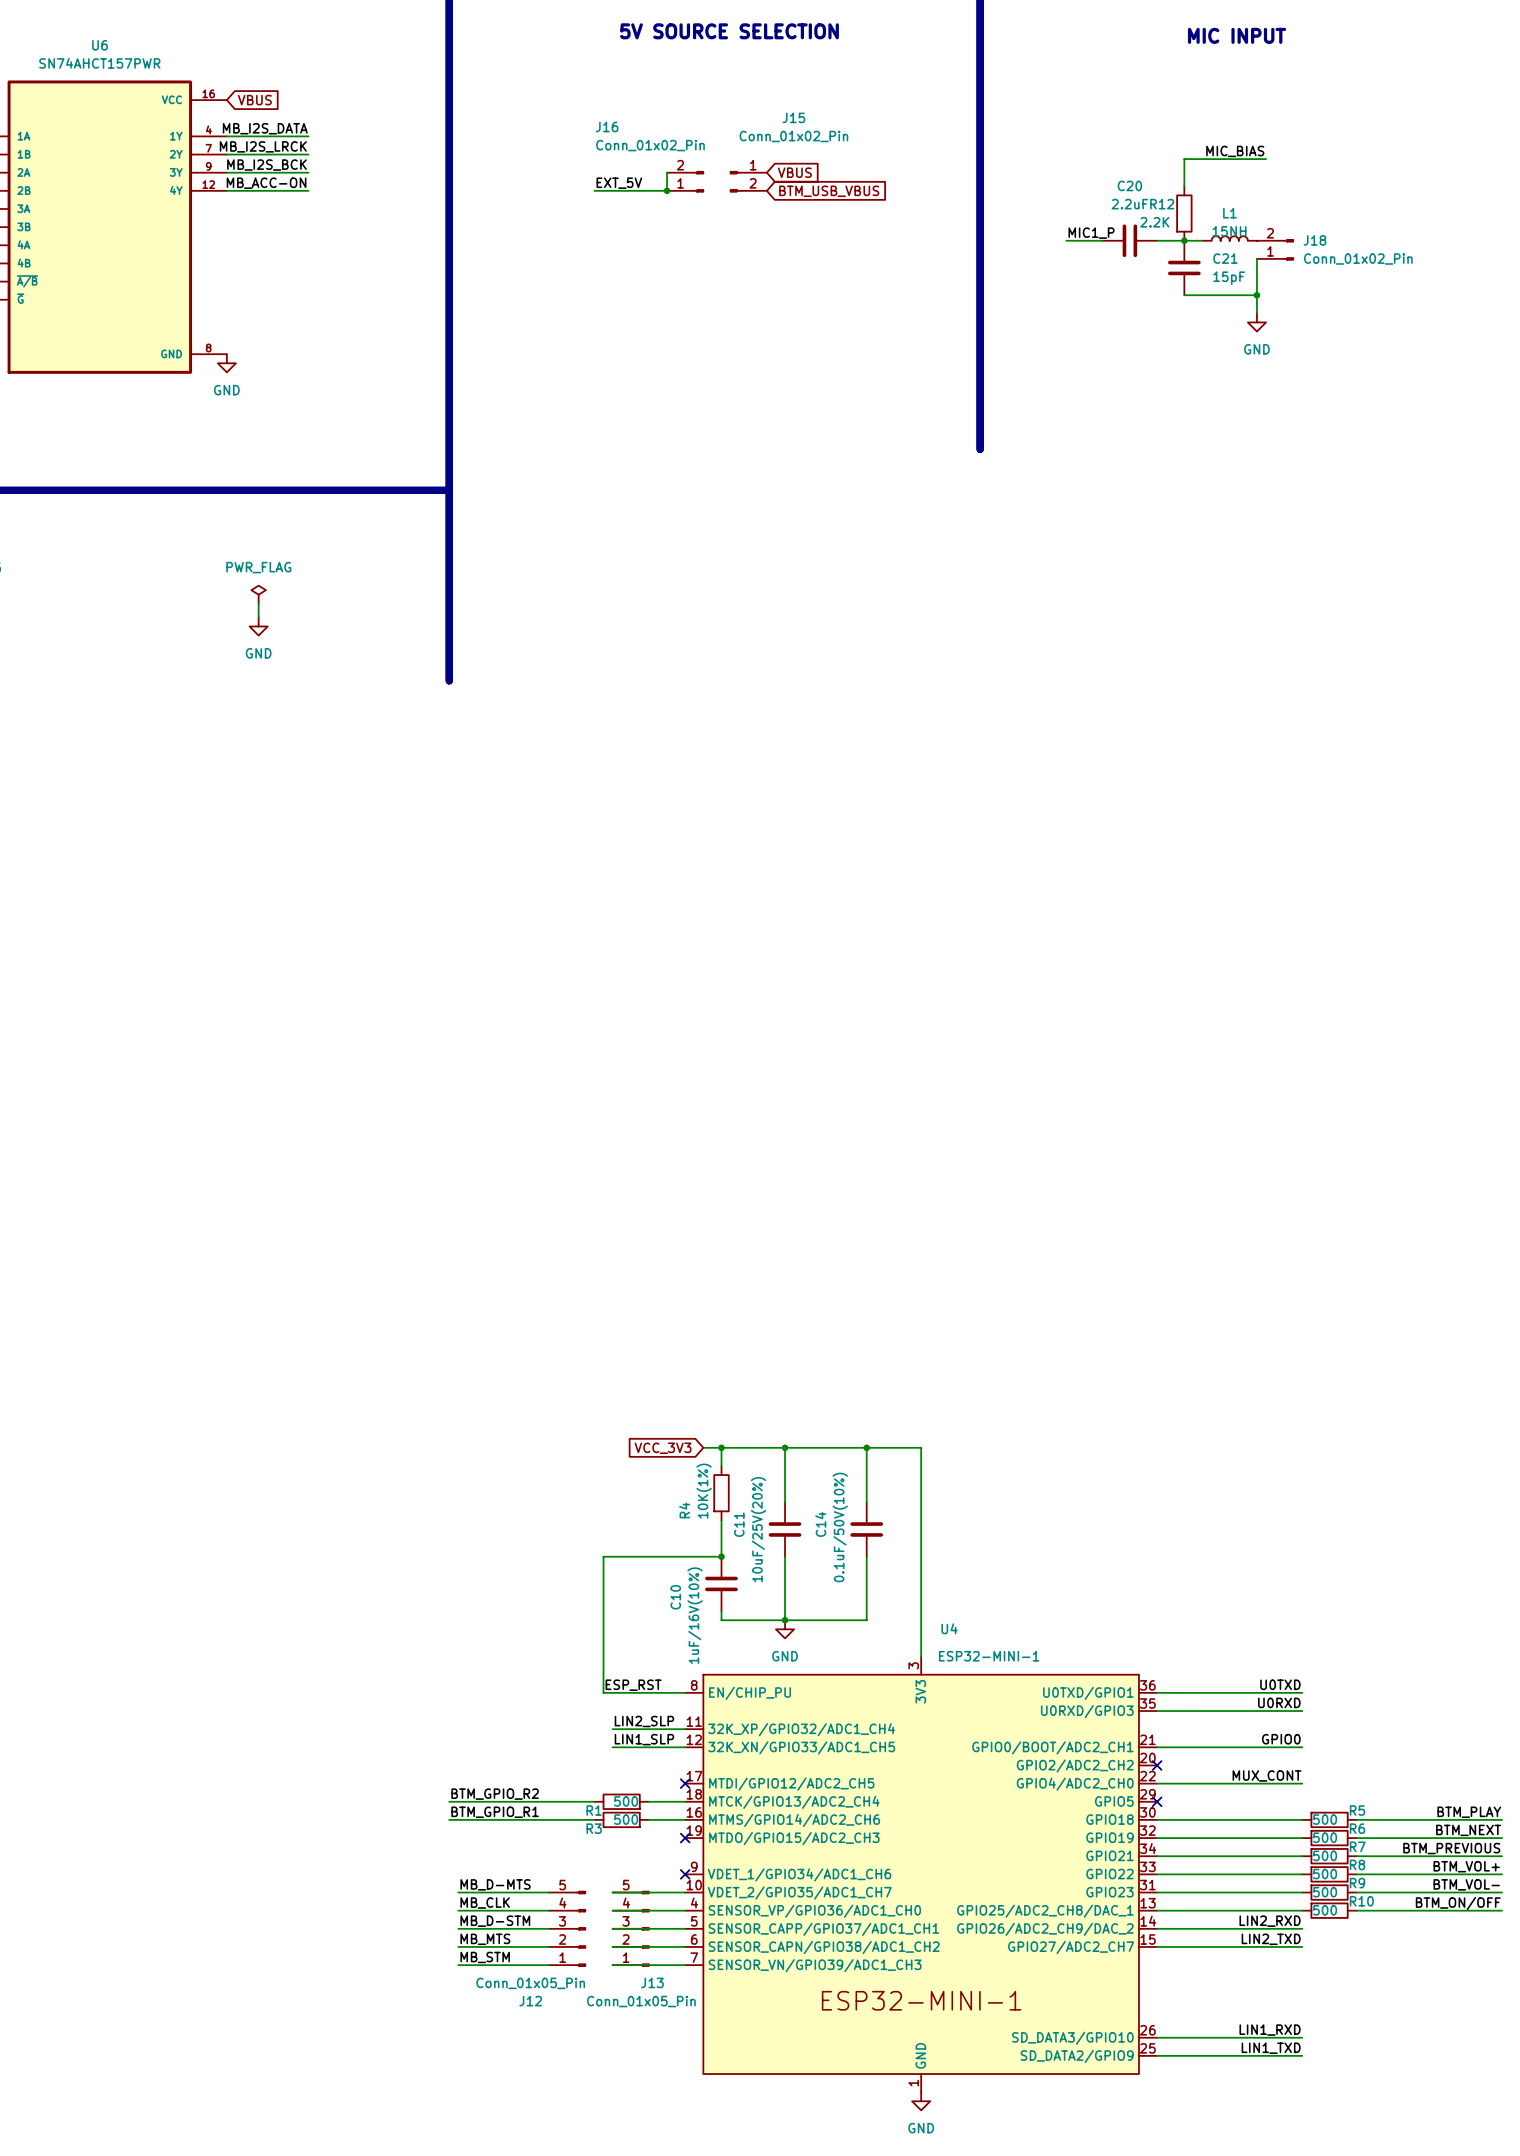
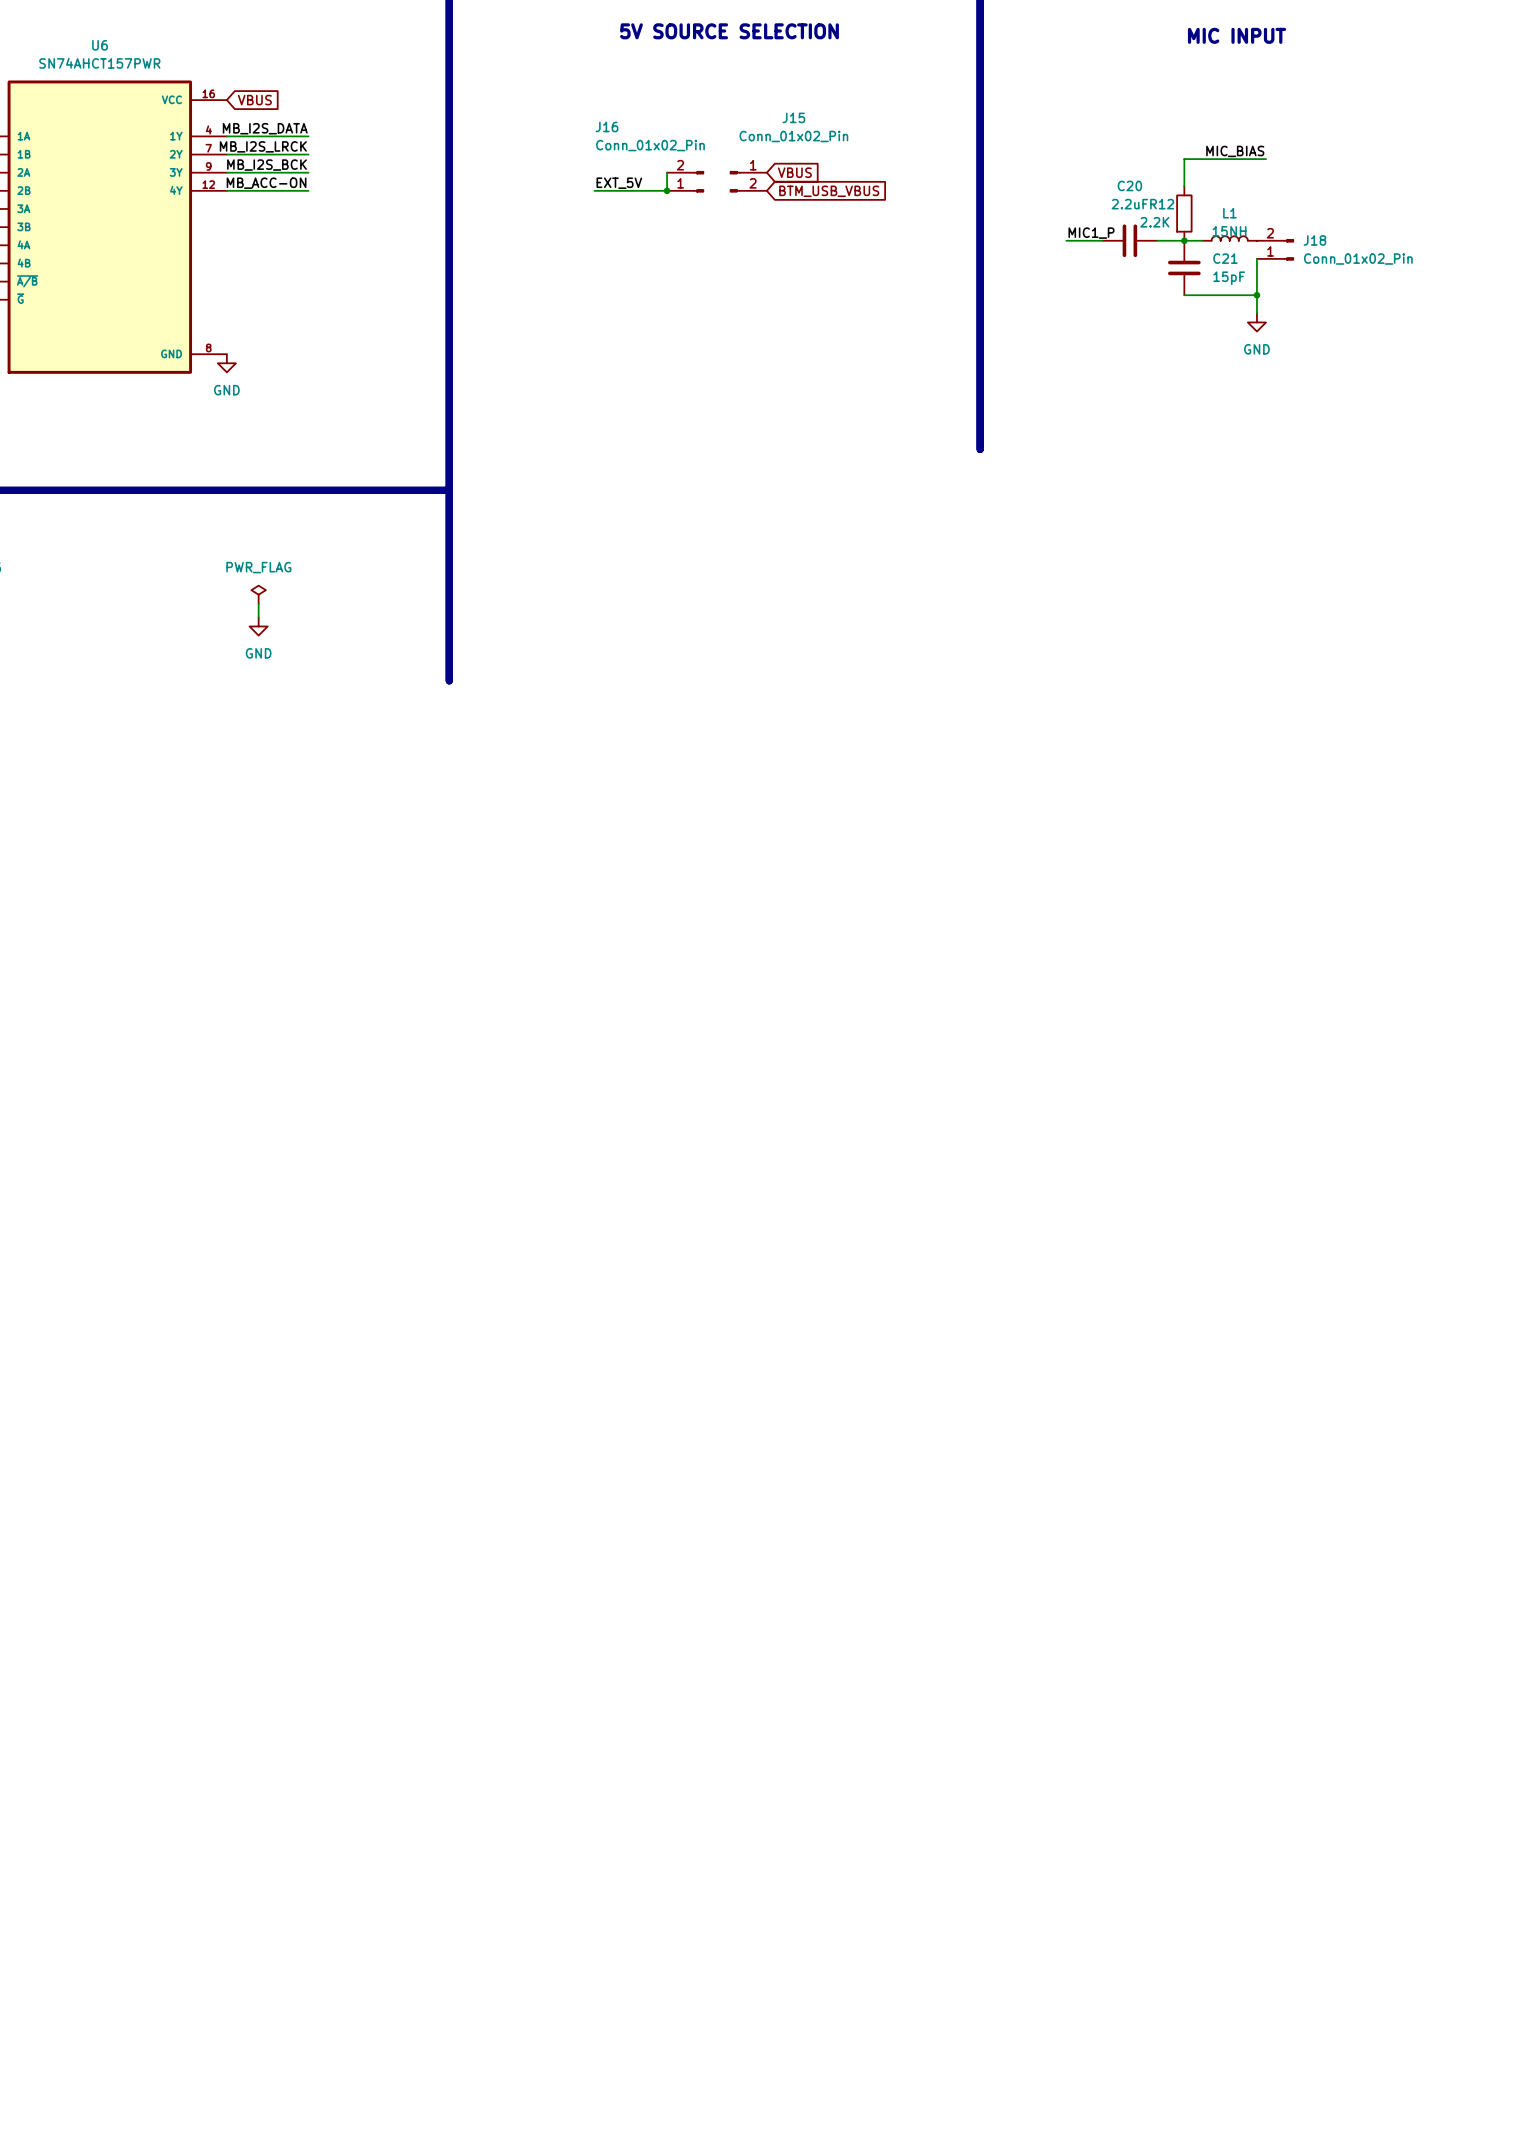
wire: (703, 1447) (921, 1447) (921, 1656) -> none
wire: (721, 1447) (721, 1465) -> none
junction: (721, 1447) -> none
wire: (785, 1447) (785, 1502) -> none
junction: (785, 1447) -> none
wire: (866, 1447) (866, 1502) -> none
junction: (866, 1447) -> none
global label: VCC_3V3 (663, 1448) -> none
R4: 10K(1%) (721, 1493) -> none
wire: (721, 1520) (721, 1556) (603, 1556) (603, 1692) (685, 1692) -> none
C11: 10uF/25V(20%) (785, 1529) -> none
C14: 0.1uF/50V(10%) (866, 1529) -> none
junction: (721, 1556) -> none
wire: (785, 1556) (785, 1620) -> none
wire: (866, 1556) (866, 1620) (721, 1620) (721, 1611) -> none
C10: 1uF/16V(10%) (721, 1583) -> none
junction: (785, 1620) -> none
power symbol: GND (785, 1629) -> none
label: U0TXD (1280, 1684) -> none
label: ESP_RST (633, 1685) -> none
wire: (1157, 1692) (1302, 1692) -> none
label: U0RXD (1279, 1702) -> none
wire: (1157, 1711) (1302, 1711) -> none
label: LIN2_SLP (644, 1721) -> none
wire: (612, 1729) (685, 1729) -> none
label: LIN1_SLP (644, 1739) -> none
label: GPIO0 (1281, 1739) -> none
wire: (612, 1747) (685, 1747) -> none
wire: (1157, 1747) (1302, 1747) -> none
no-connect mark: (1157, 1765) -> none
label: MUX_CONT (1267, 1775) -> none
no-connect mark: (685, 1783) -> none
wire: (1157, 1783) (1302, 1783) -> none
label: BTM_GPIO_R2 (495, 1794) -> none
wire: (449, 1801) (594, 1801) -> none
R1: 500 (621, 1801) -> none
wire: (648, 1801) (685, 1801) -> none
no-connect mark: (1157, 1801) -> none
label: BTM_GPIO_R1 (495, 1812) -> none
label: BTM_PLAY (1469, 1812) -> none
wire: (449, 1819) (594, 1819) -> none
R3: 500 (621, 1819) -> none
wire: (648, 1819) (685, 1819) -> none
wire: (1157, 1819) (1302, 1819) -> none
R5: 500 (1329, 1819) -> none
wire: (1356, 1819) (1502, 1819) -> none
label: BTM_NEXT (1468, 1830) -> none
no-connect mark: (685, 1838) -> none
wire: (1157, 1838) (1302, 1838) -> none
R6: 500 (1329, 1838) -> none
wire: (1356, 1838) (1502, 1838) -> none
label: BTM_PREVIOUS (1451, 1848) -> none
wire: (1157, 1856) (1302, 1856) -> none
R7: 500 (1329, 1856) -> none
wire: (1356, 1856) (1502, 1856) -> none
label: BTM_VOL+ (1466, 1866) -> none
no-connect mark: (685, 1874) -> none
U4: ESP32-MINI-1 (921, 1874) -> none
wire: (1157, 1874) (1302, 1874) -> none
R8: 500 (1329, 1874) -> none
wire: (1356, 1874) (1502, 1874) -> none
label: MB_D-MTS (495, 1884) -> none
label: BTM_VOL- (1466, 1884) -> none
wire: (458, 1892) (549, 1892) -> none
wire: (612, 1892) (685, 1892) -> none
wire: (1157, 1892) (1302, 1892) -> none
R9: 500 (1329, 1892) -> none
wire: (1356, 1892) (1502, 1892) -> none
label: MB_CLK (485, 1903) -> none
label: BTM_ON/OFF (1458, 1903) -> none
wire: (458, 1910) (549, 1910) -> none
wire: (612, 1910) (685, 1910) -> none
wire: (1157, 1910) (1302, 1910) -> none
R10: 500 (1329, 1910) -> none
wire: (1356, 1910) (1502, 1910) -> none
label: MB_D-STM (495, 1921) -> none
label: LIN2_RXD (1270, 1921) -> none
wire: (458, 1928) (549, 1928) -> none
J12: Conn_01x05_Pin (567, 1928) -> none
wire: (612, 1928) (685, 1928) -> none
J13: Conn_01x05_Pin (631, 1928) -> none
wire: (1157, 1928) (1302, 1928) -> none
label: MB_MTS (485, 1939) -> none
label: LIN2_TXD (1271, 1939) -> none
wire: (458, 1946) (549, 1946) -> none
wire: (612, 1946) (685, 1946) -> none
wire: (1157, 1946) (1302, 1946) -> none
label: MB_STM (485, 1957) -> none
wire: (458, 1965) (549, 1965) -> none
wire: (612, 1965) (685, 1965) -> none
label: LIN1_RXD (1270, 2030) -> none
wire: (1157, 2037) (1302, 2037) -> none
label: LIN1_TXD (1271, 2048) -> none
wire: (1157, 2055) (1302, 2055) -> none
power symbol: GND (921, 2101) -> none

